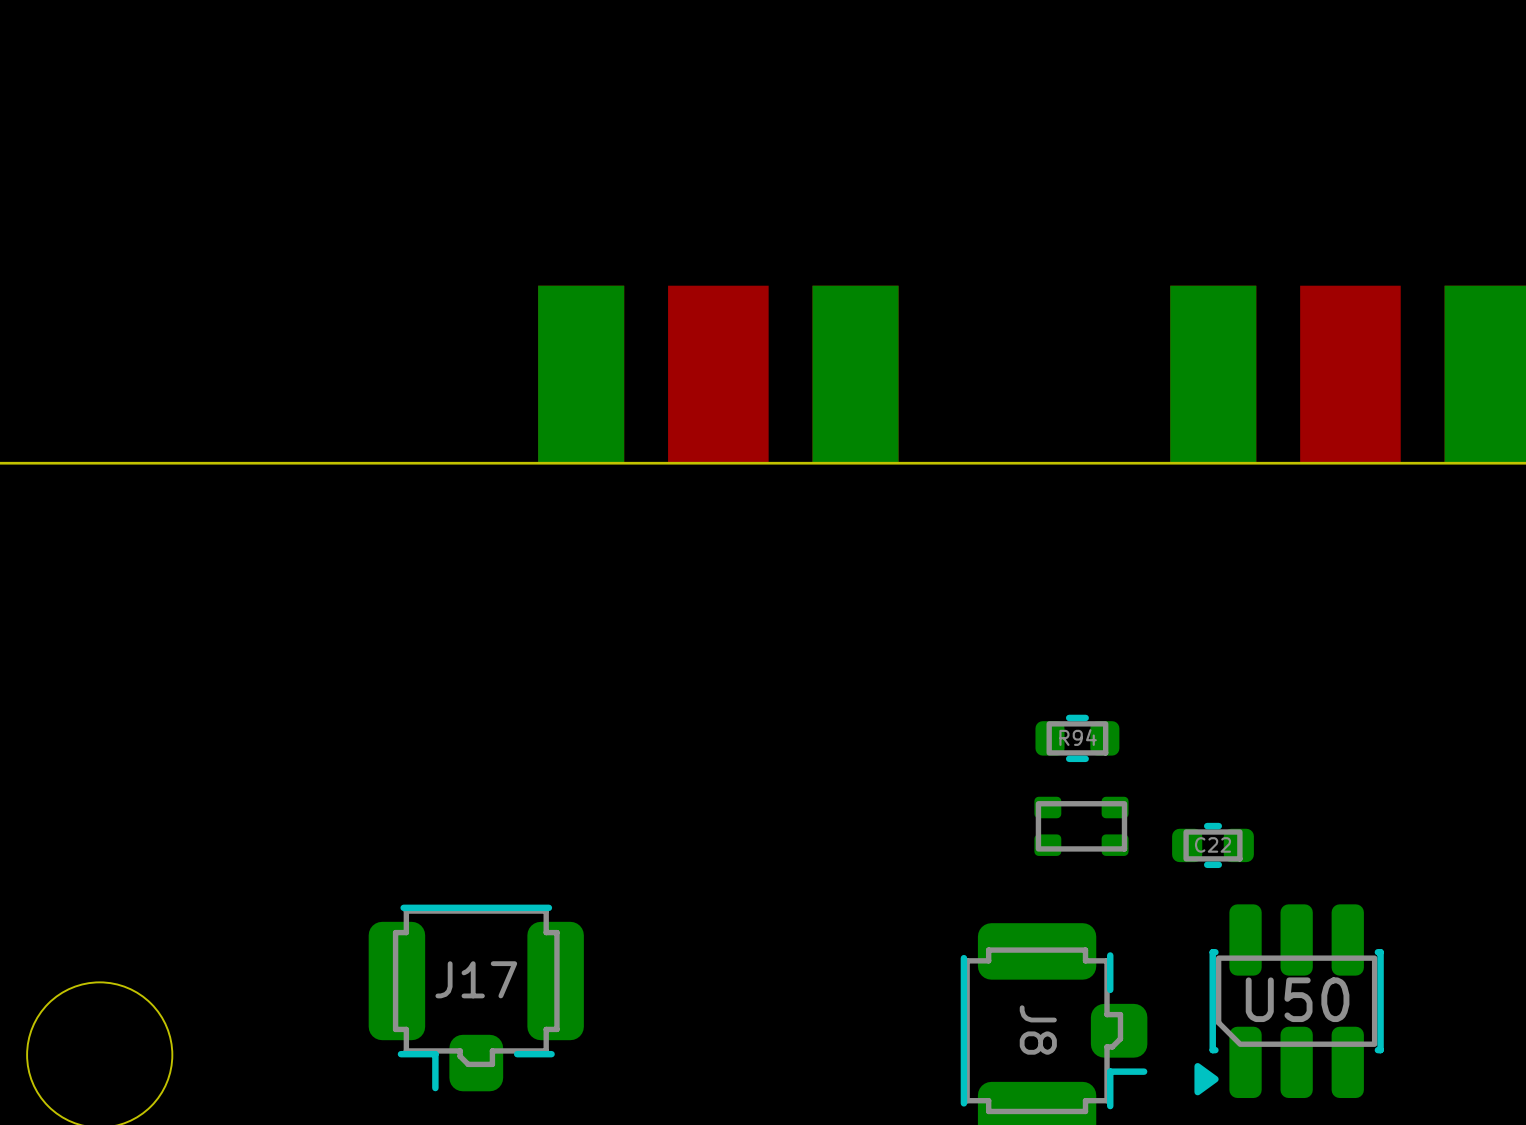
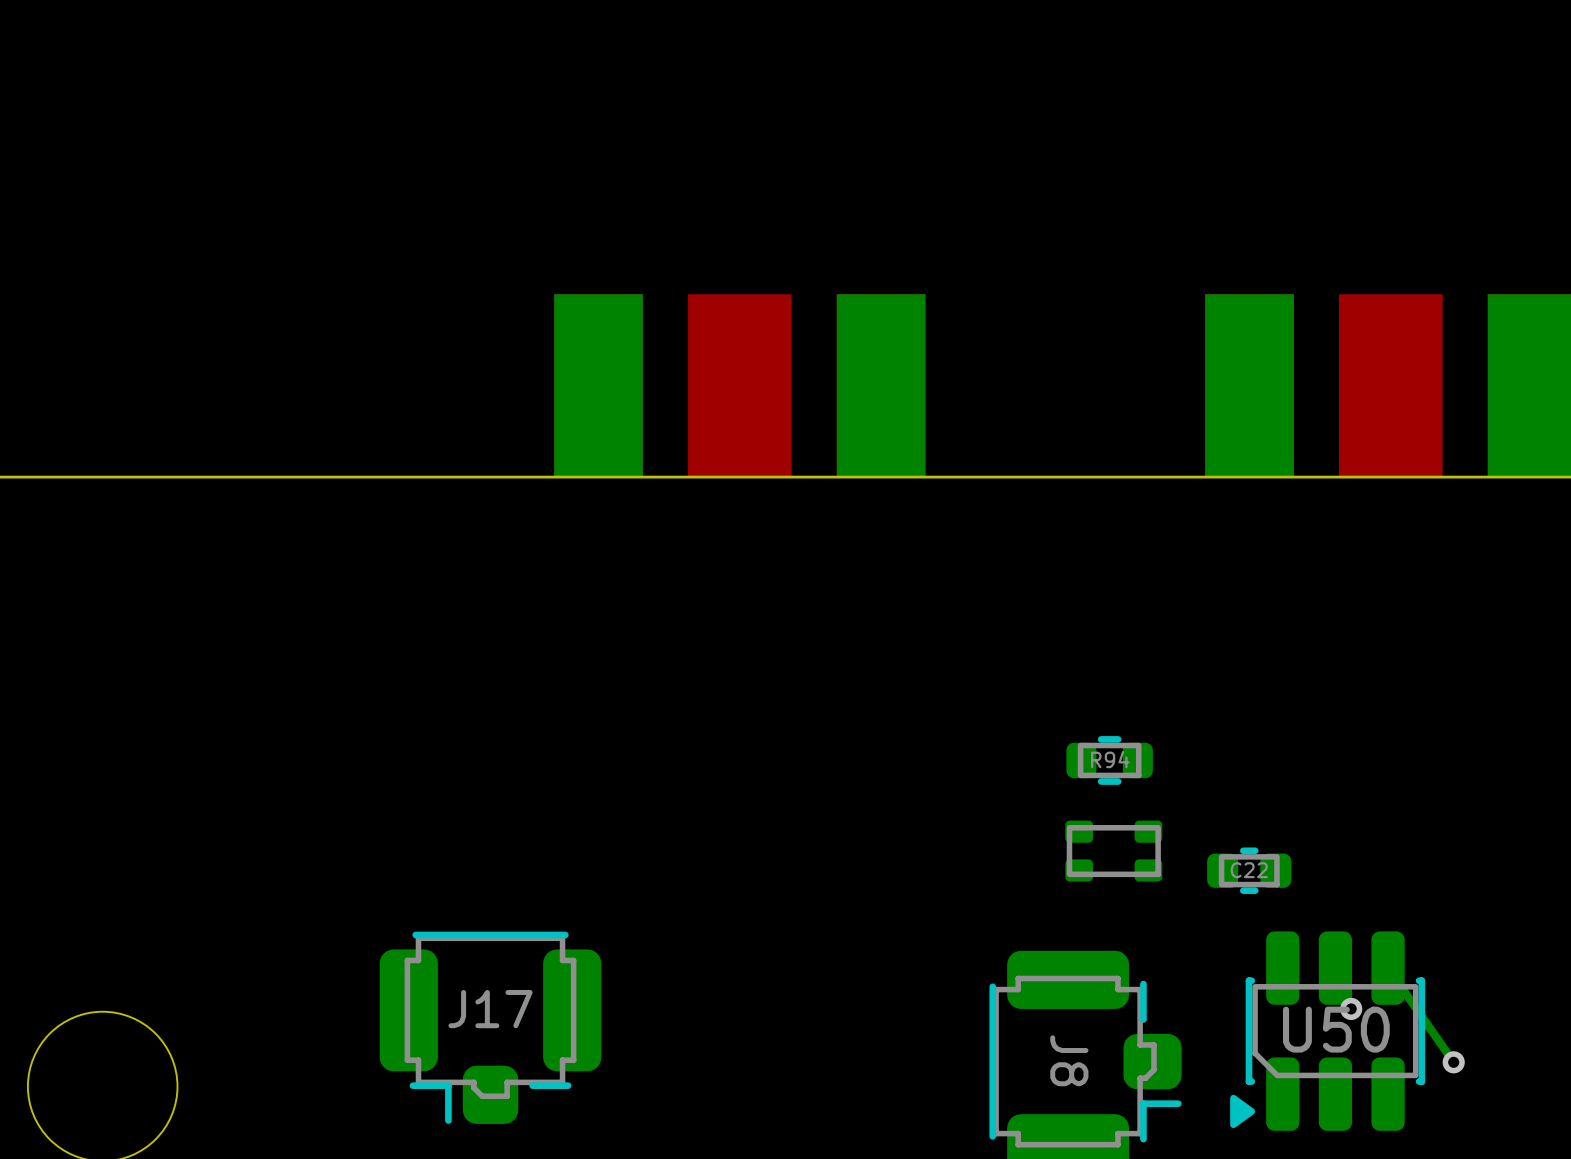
bottom track: none -> (1388, 968) (1453, 1062)
via: none -> (1351, 1008)
via: none -> (1453, 1062)

